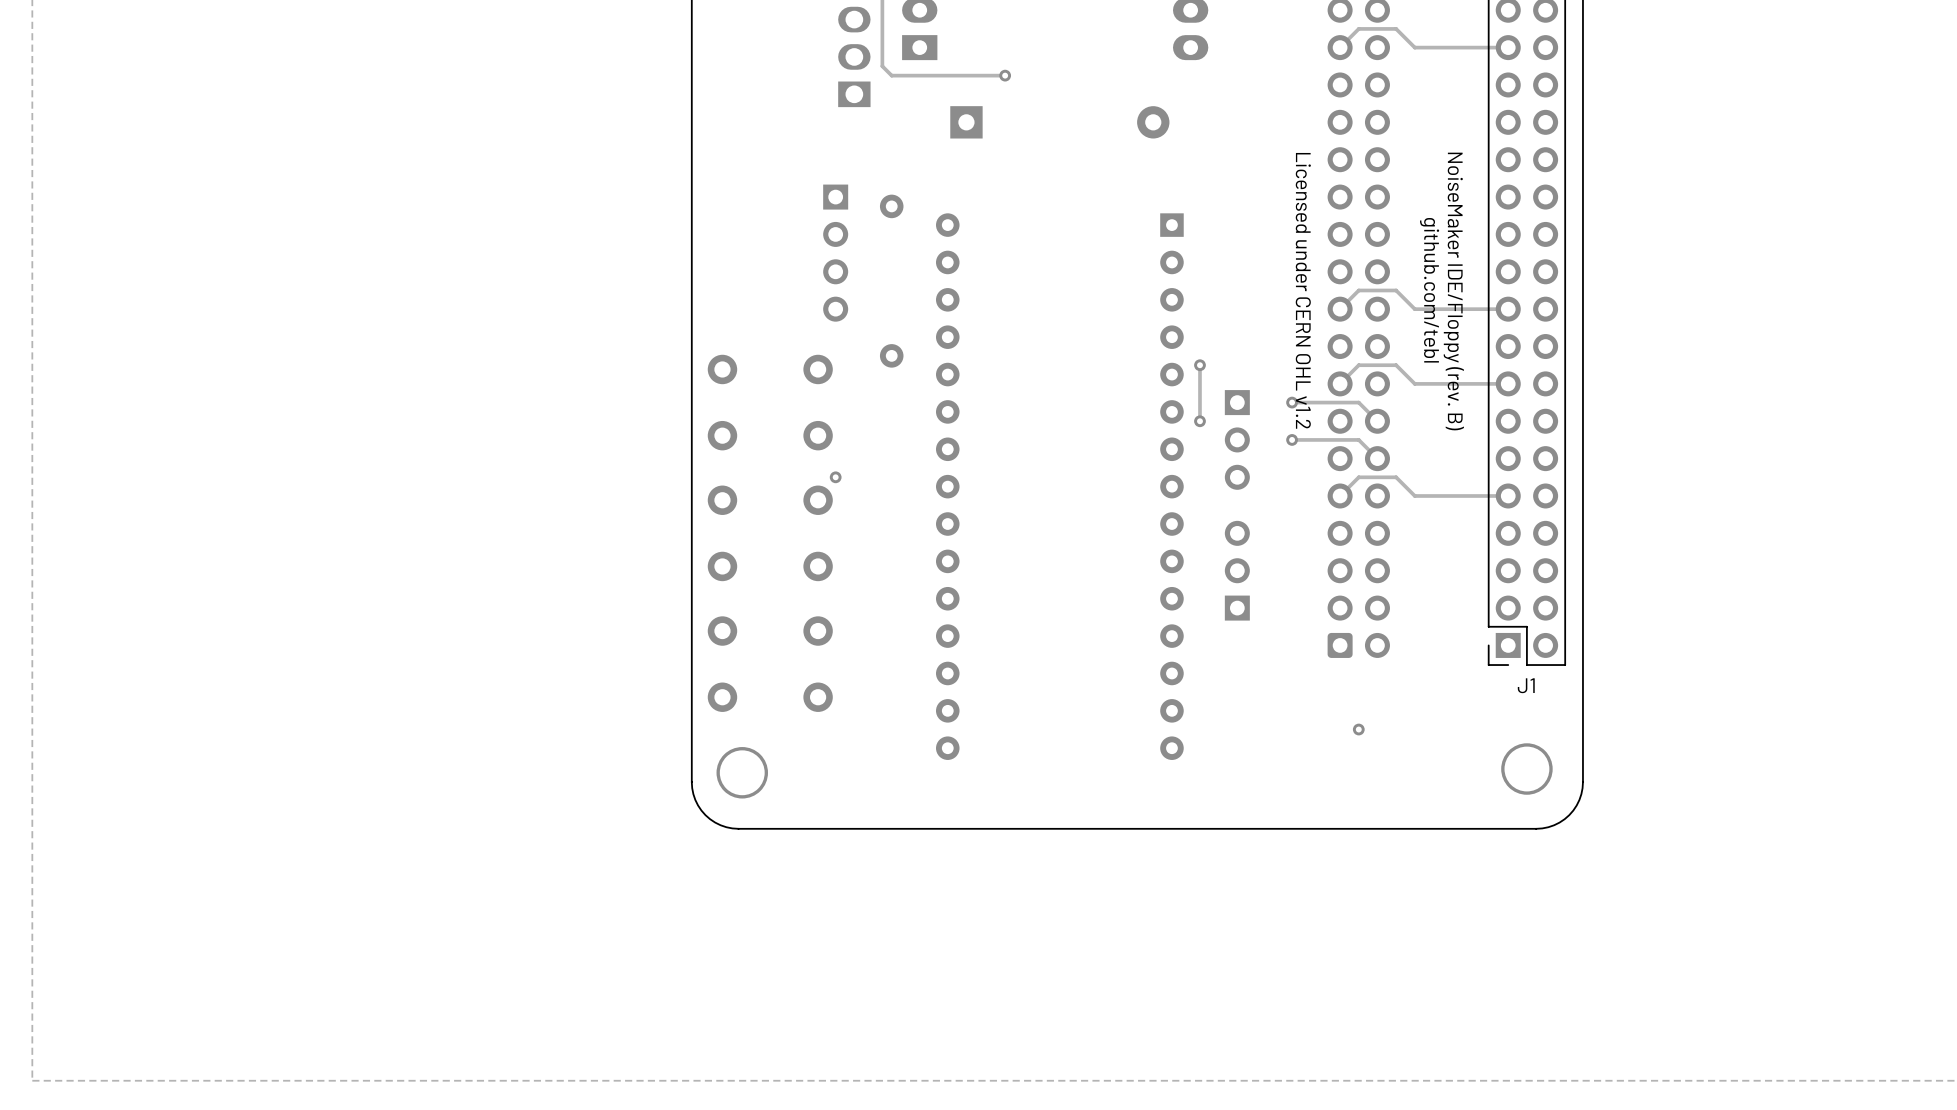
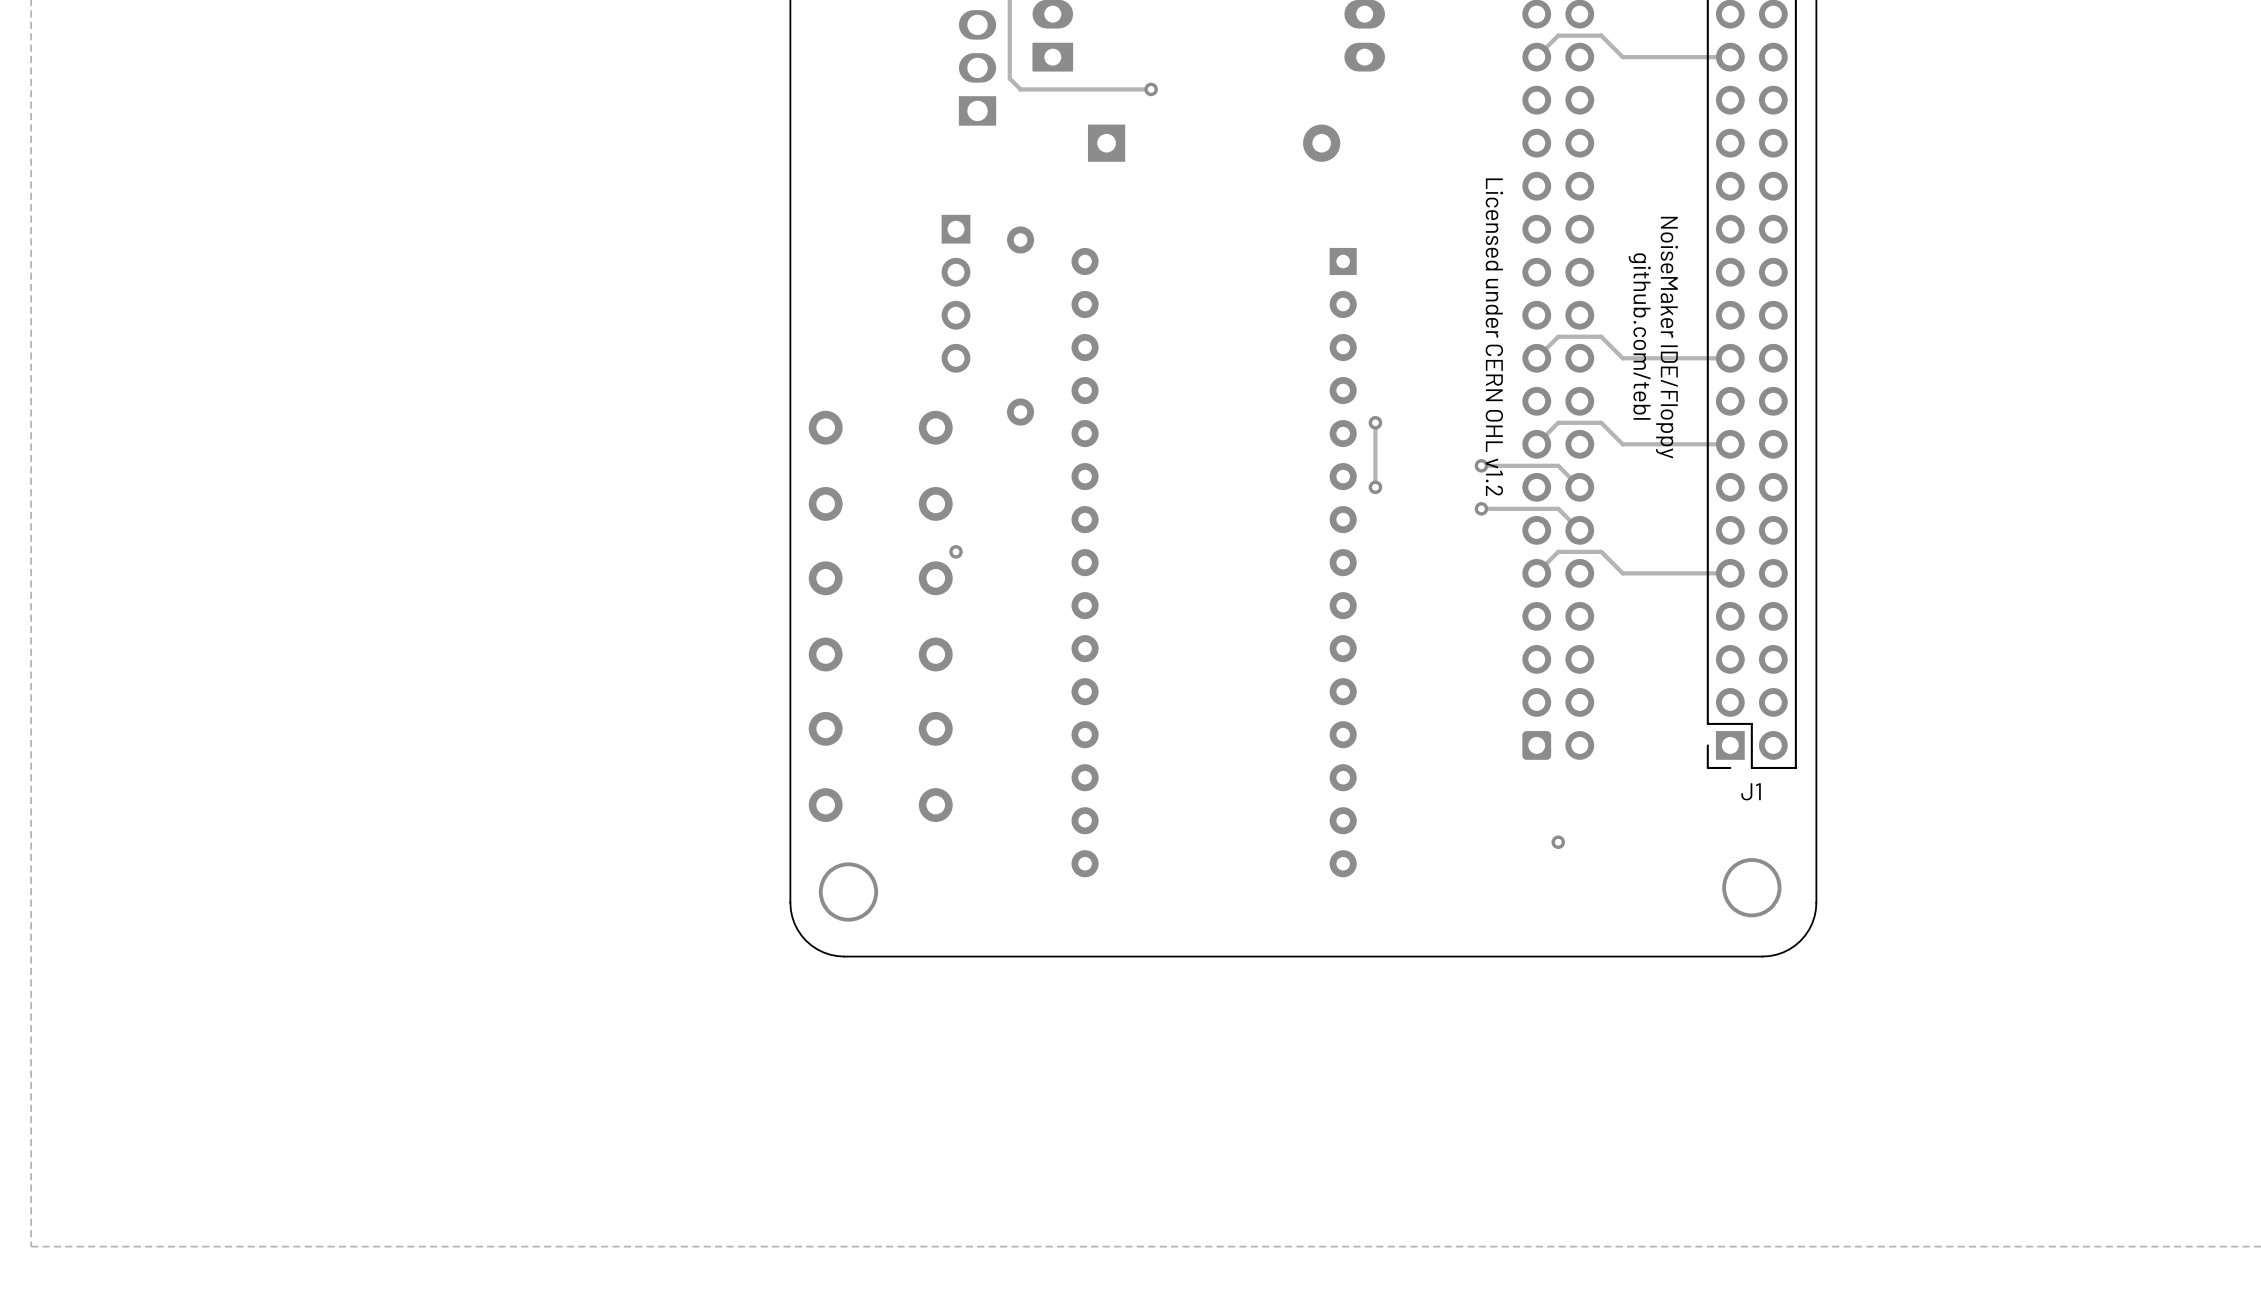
text: NoiseMaker IDE/Floppy (rev. B) (1453, 291) -> NoiseMaker IDE/Floppy (1667, 337)
part: (1237, 439) -> none
part: (1237, 570) -> none

